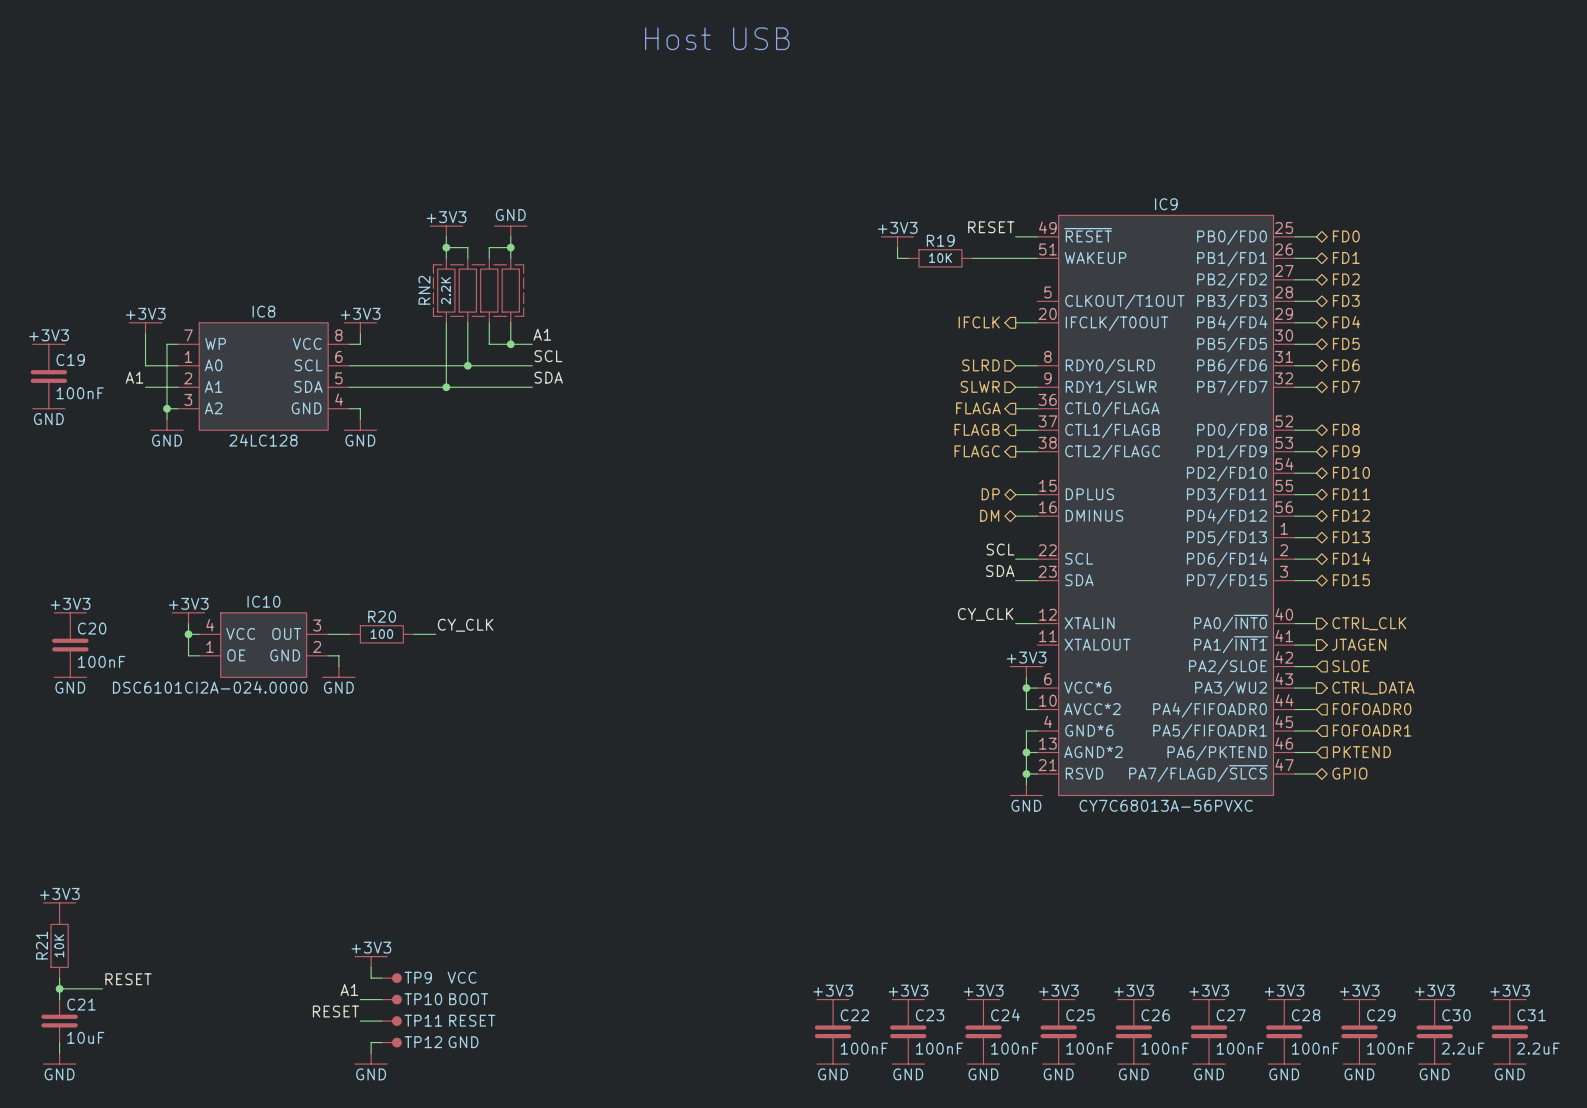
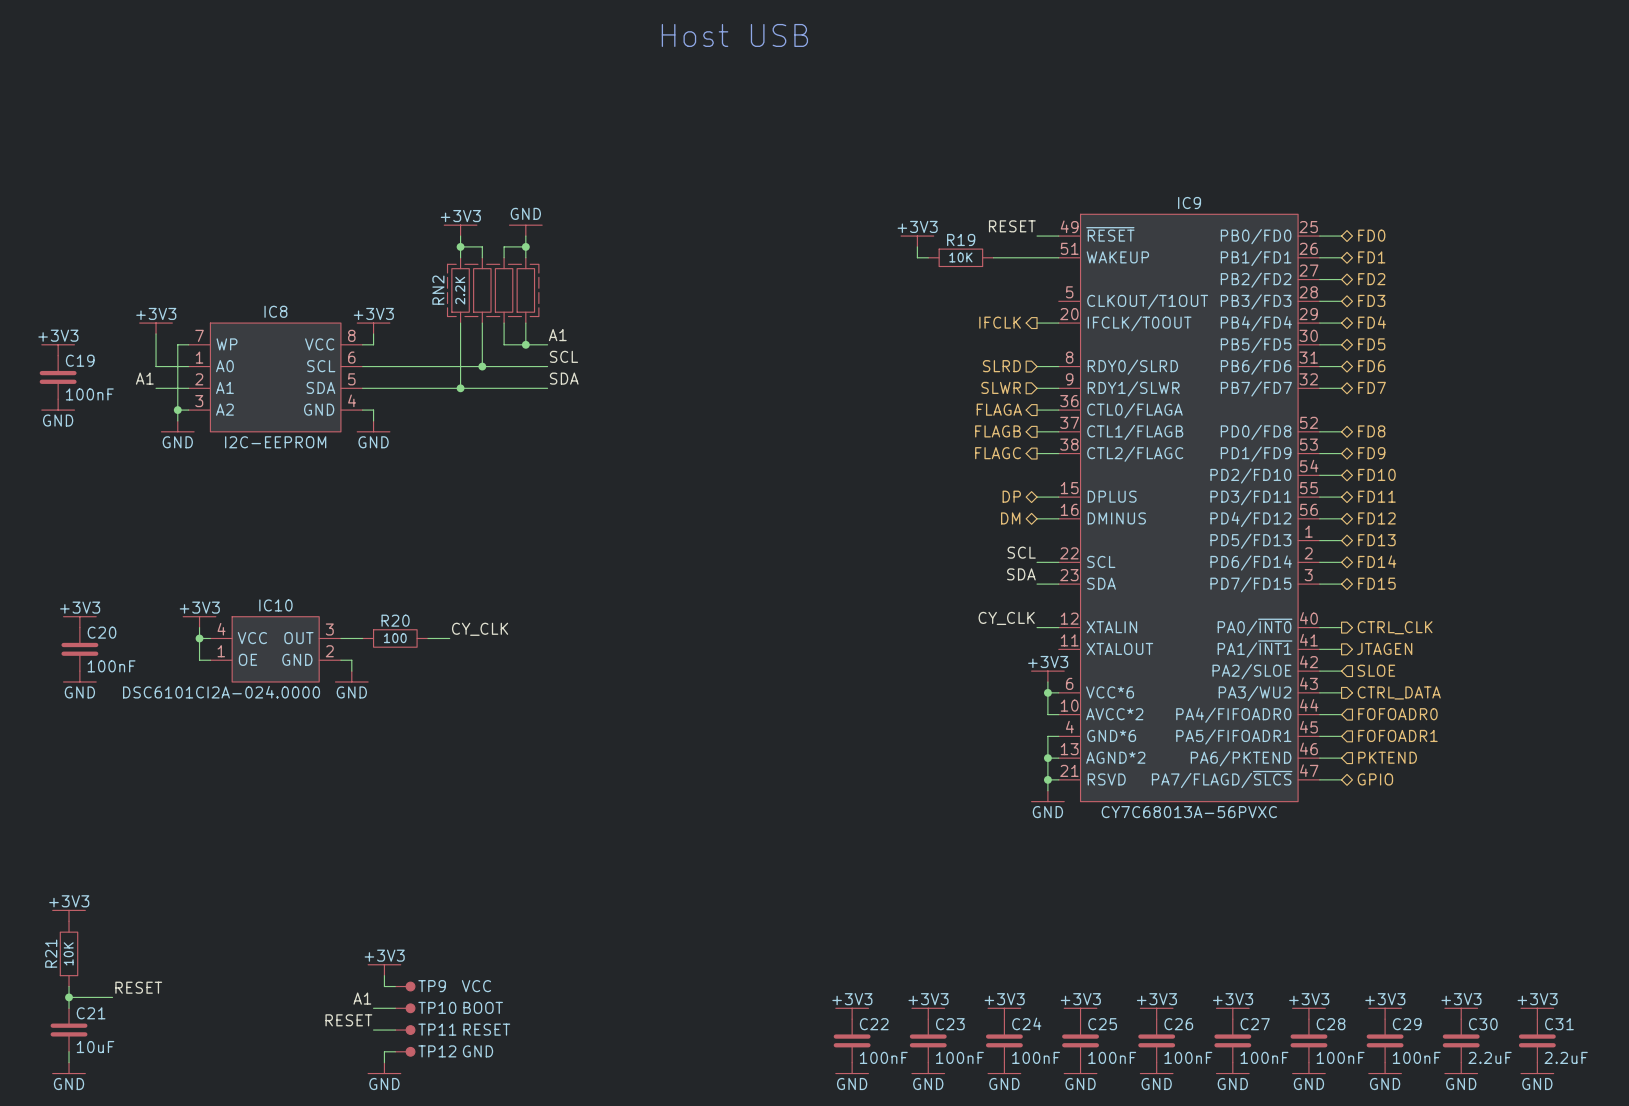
IC8 value: 24LC128 (263, 440) -> I2C-EEPROM (275, 442)

